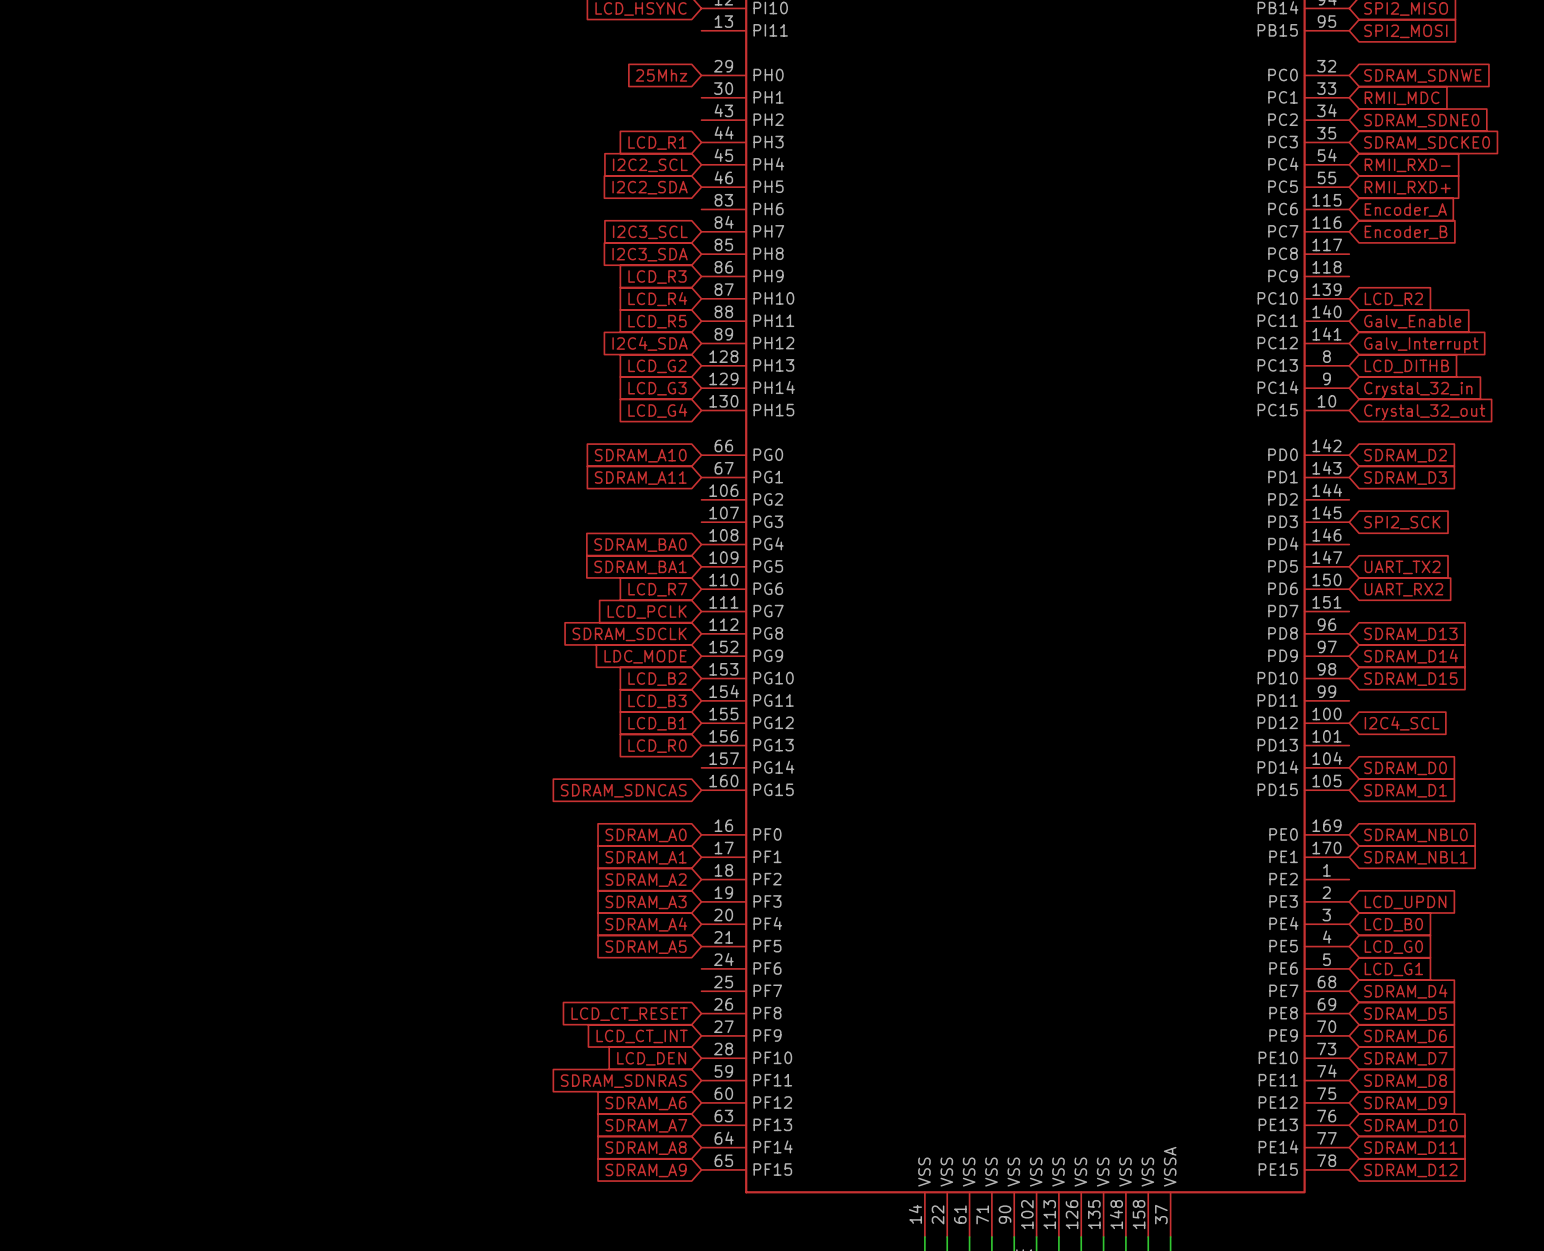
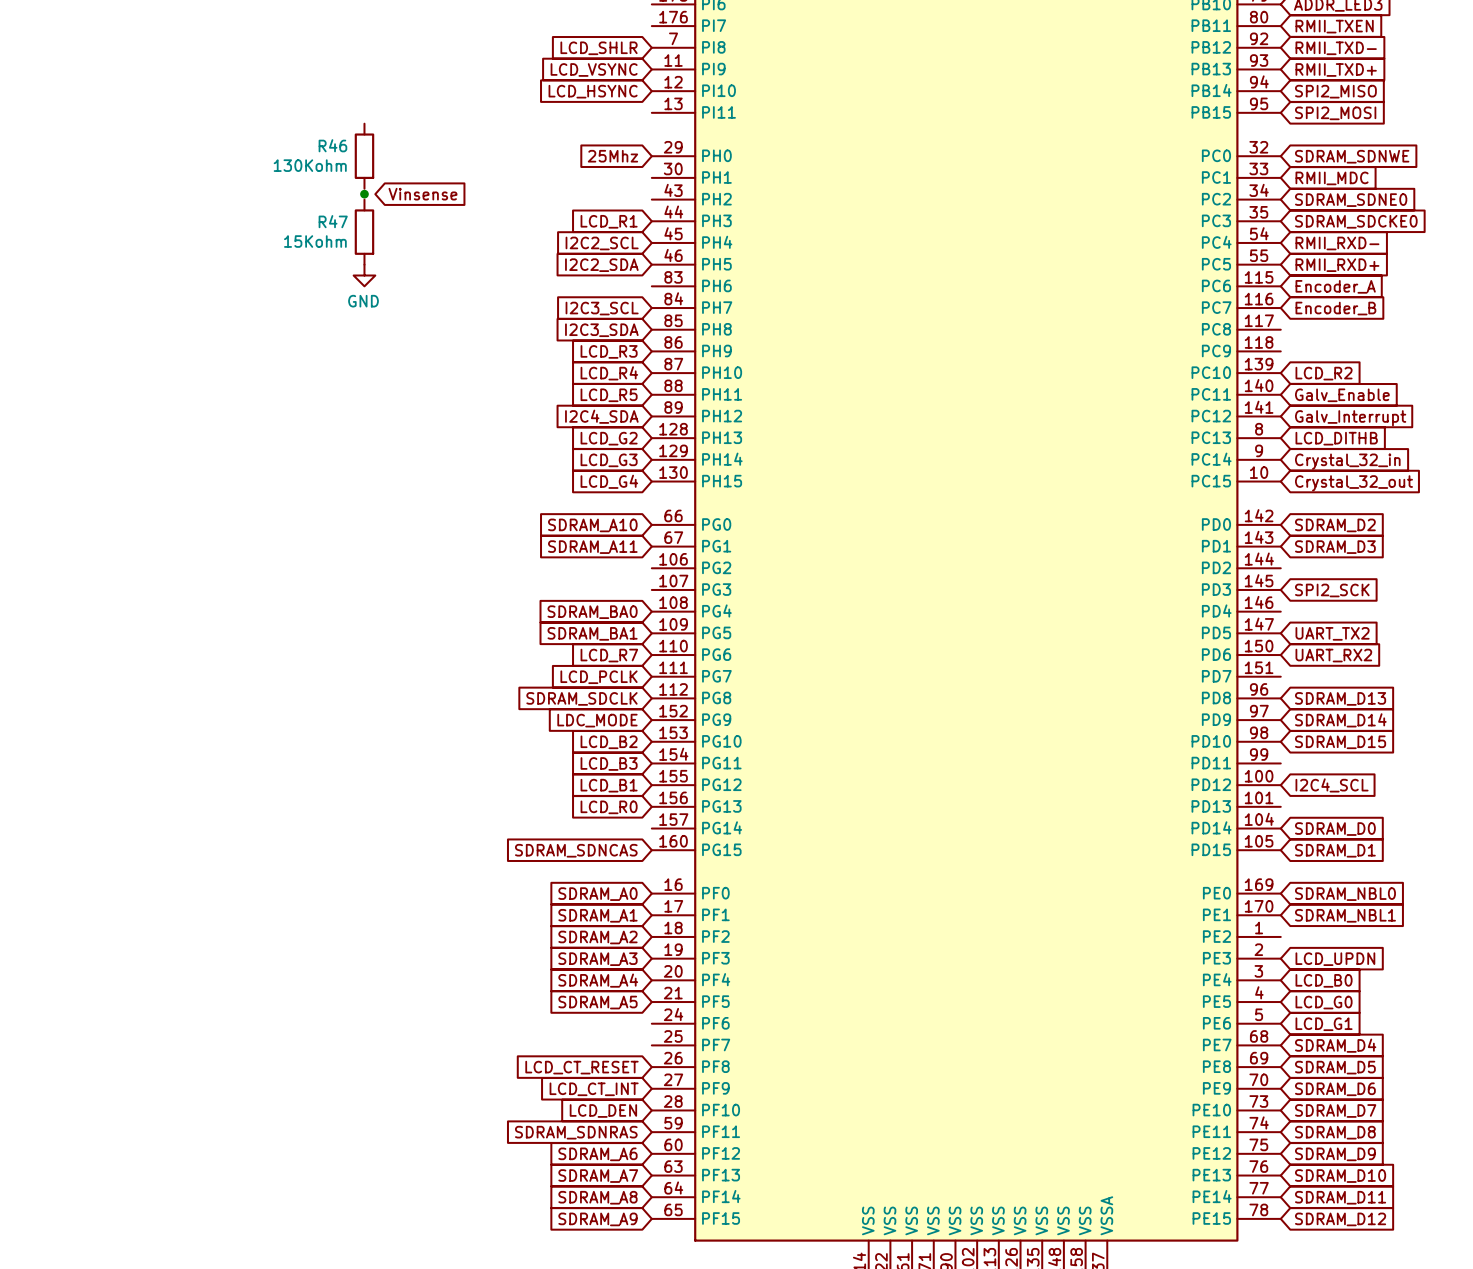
R46: none -> 130Kohm (364, 156)
junction: none -> (364, 194)
global label: none -> Vinsense (422, 194)
R47: none -> 15Kohm (364, 232)
power symbol: none -> GND (364, 275)

